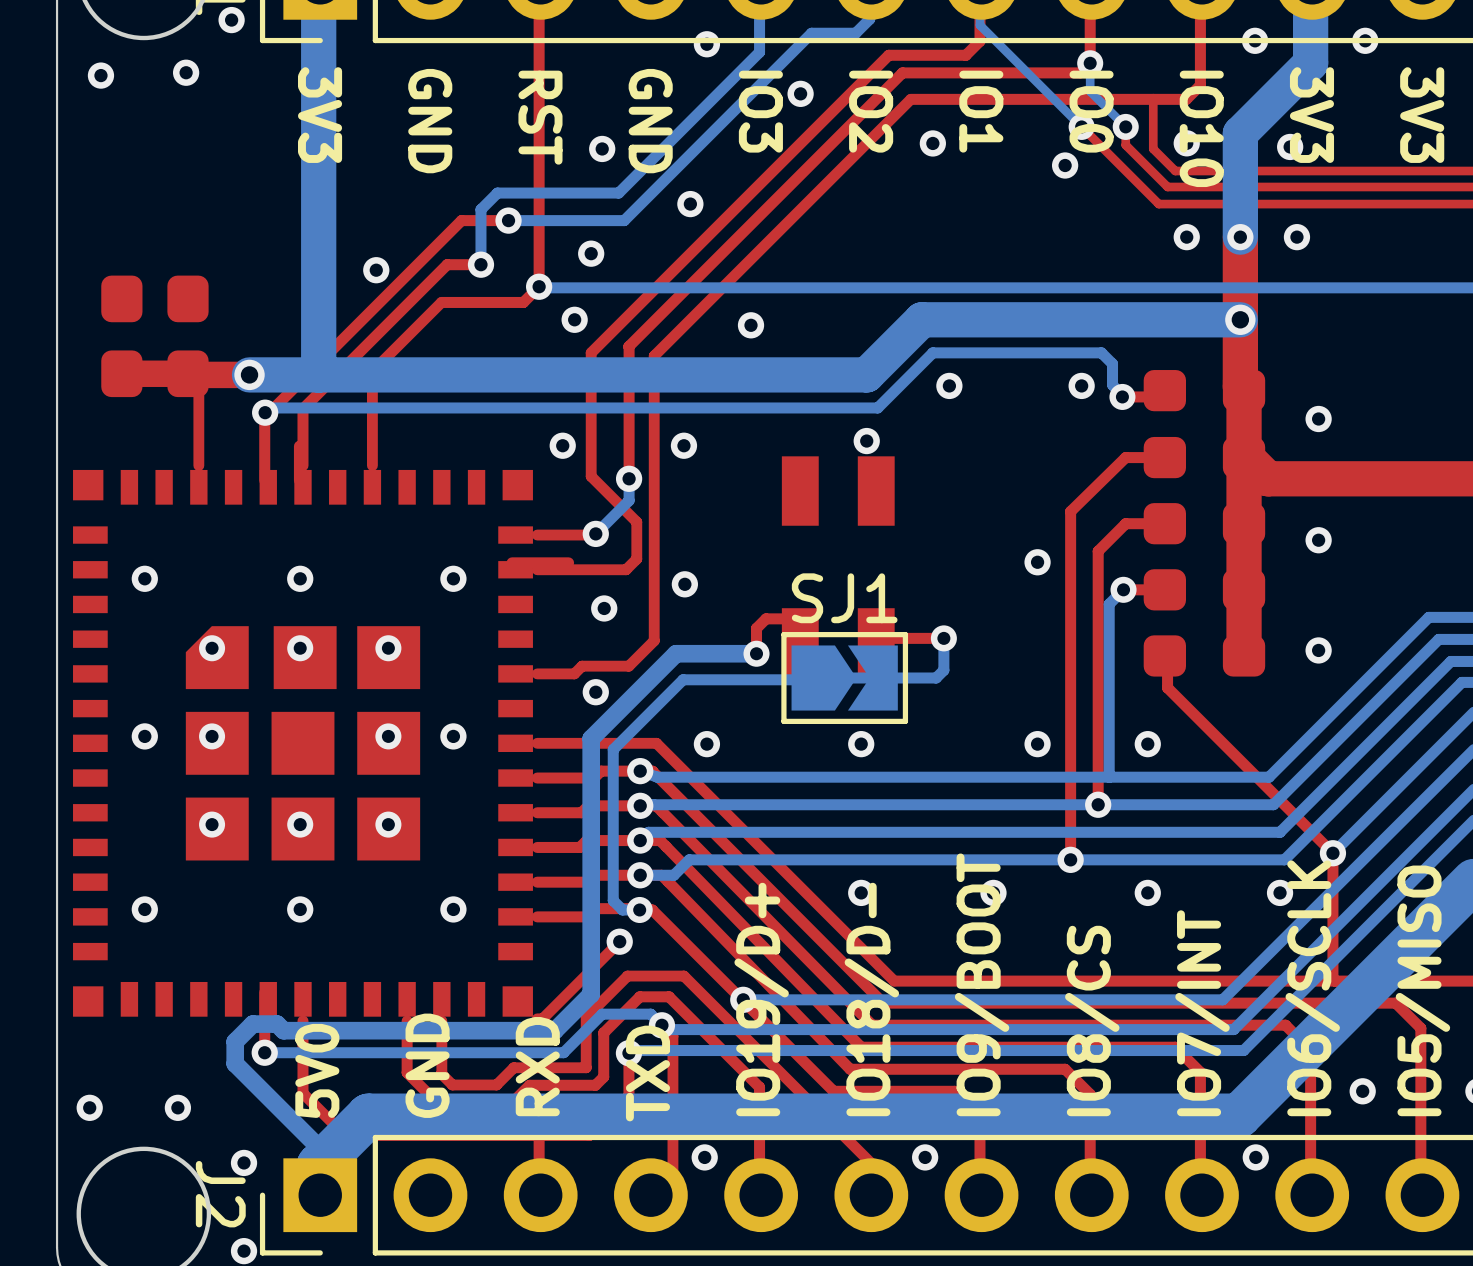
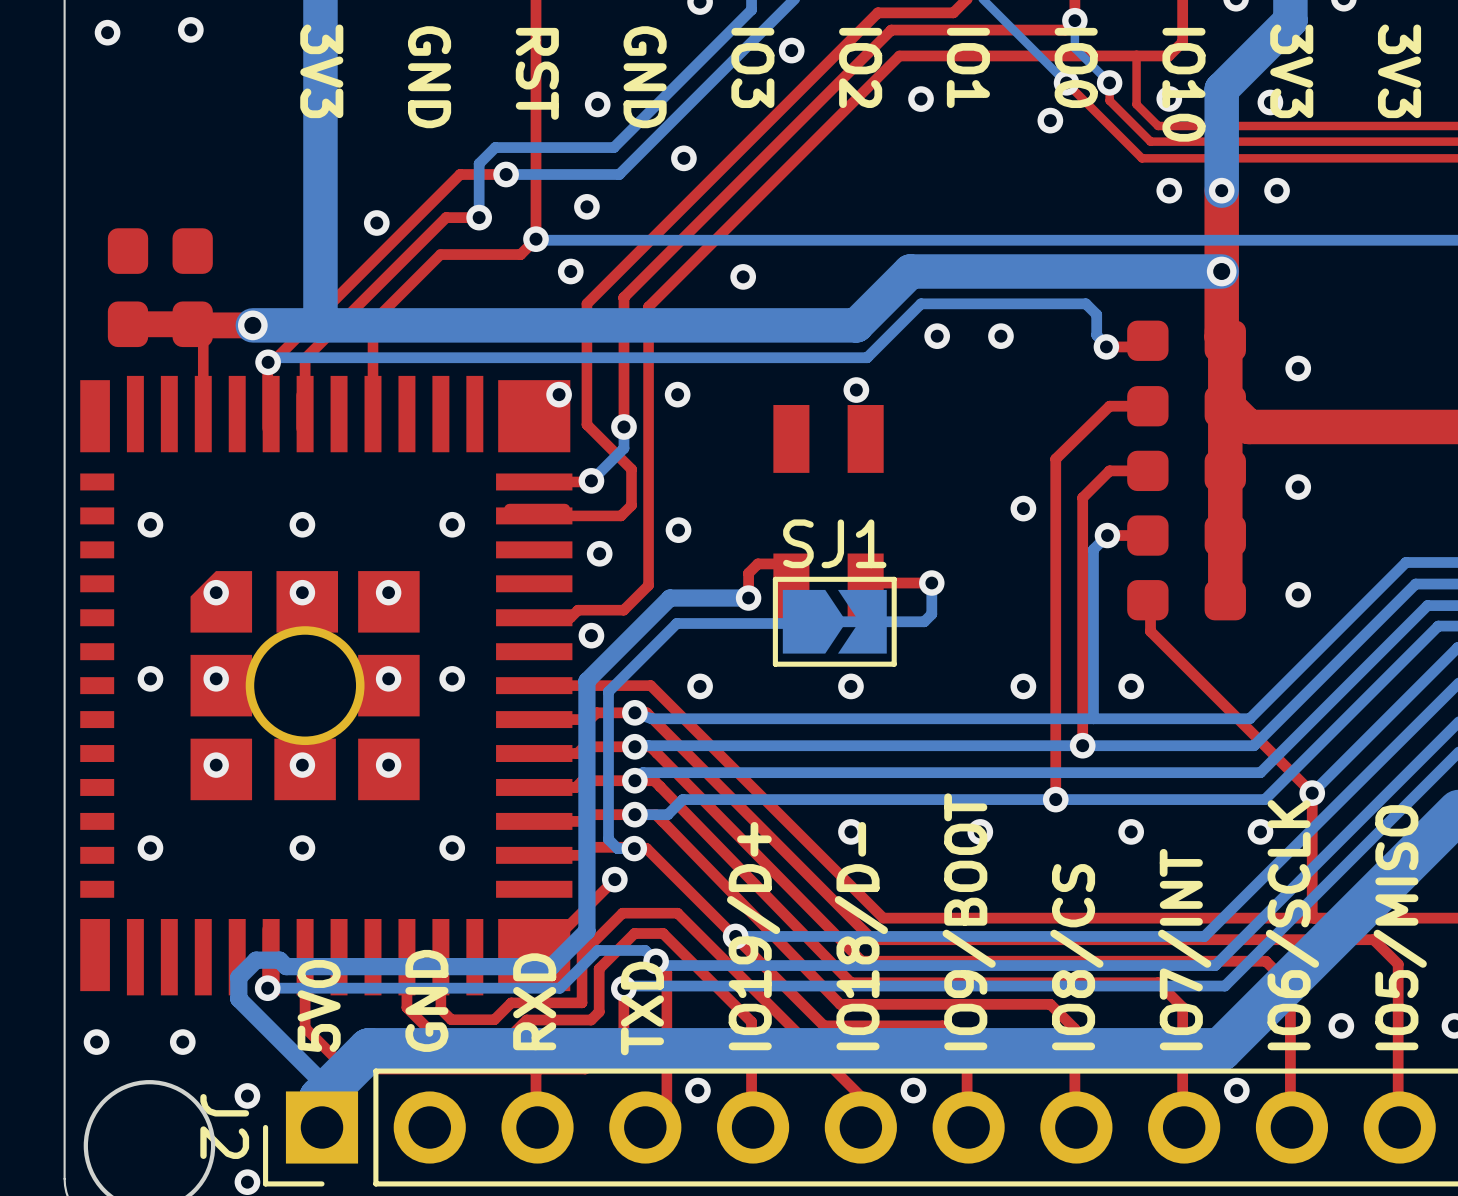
via position: (1081, 385) -> (1000, 336)
part footprint: [73, 469, 533, 1017] -> [80, 375, 573, 996]

